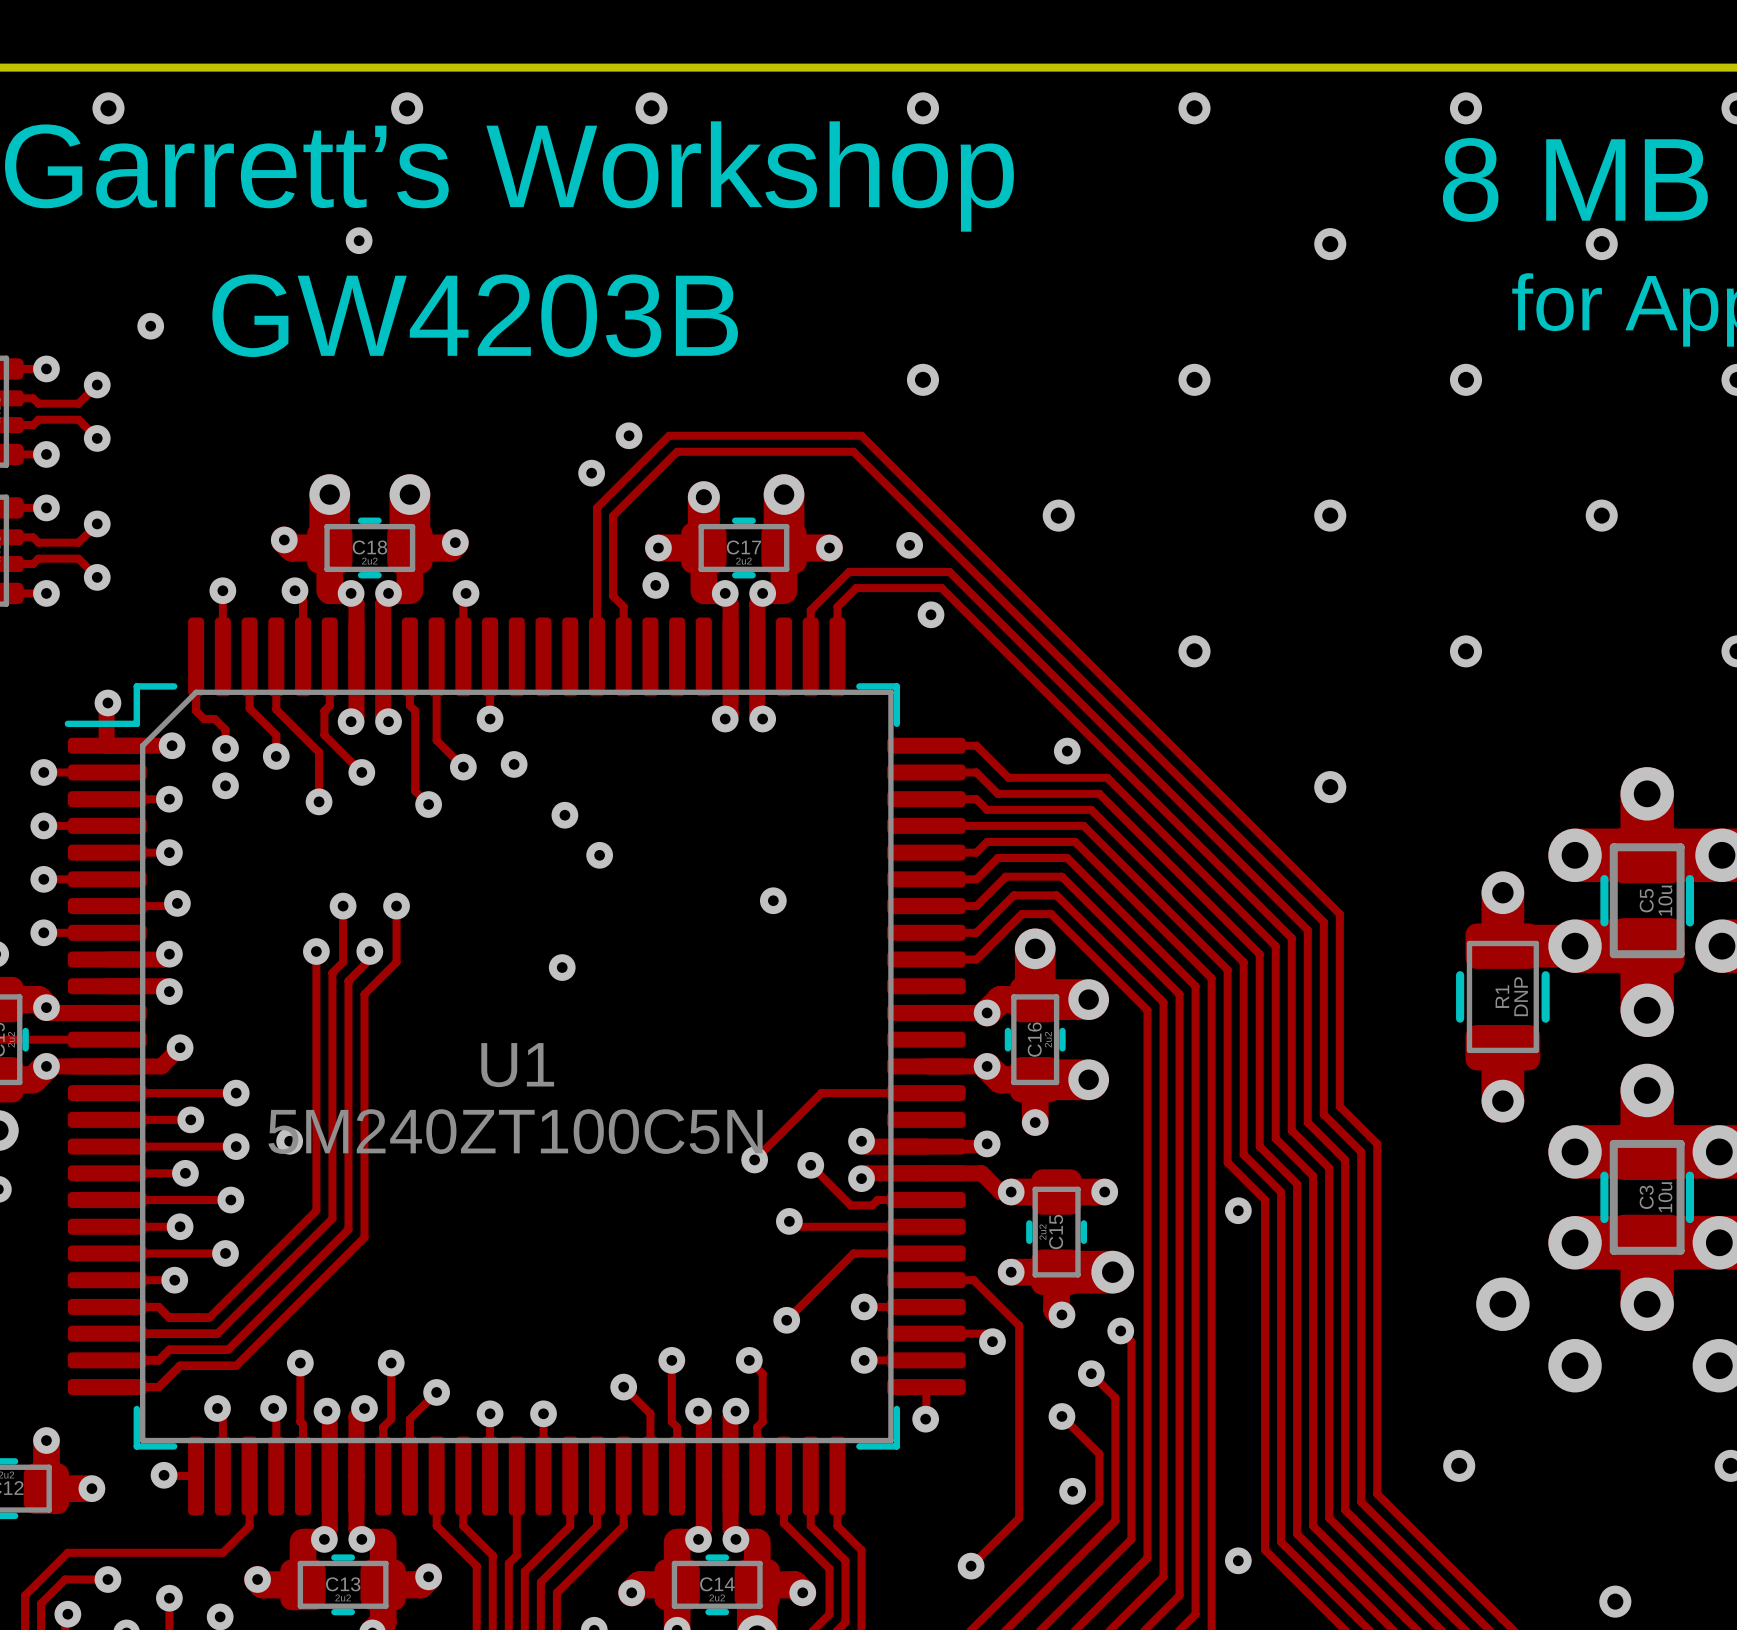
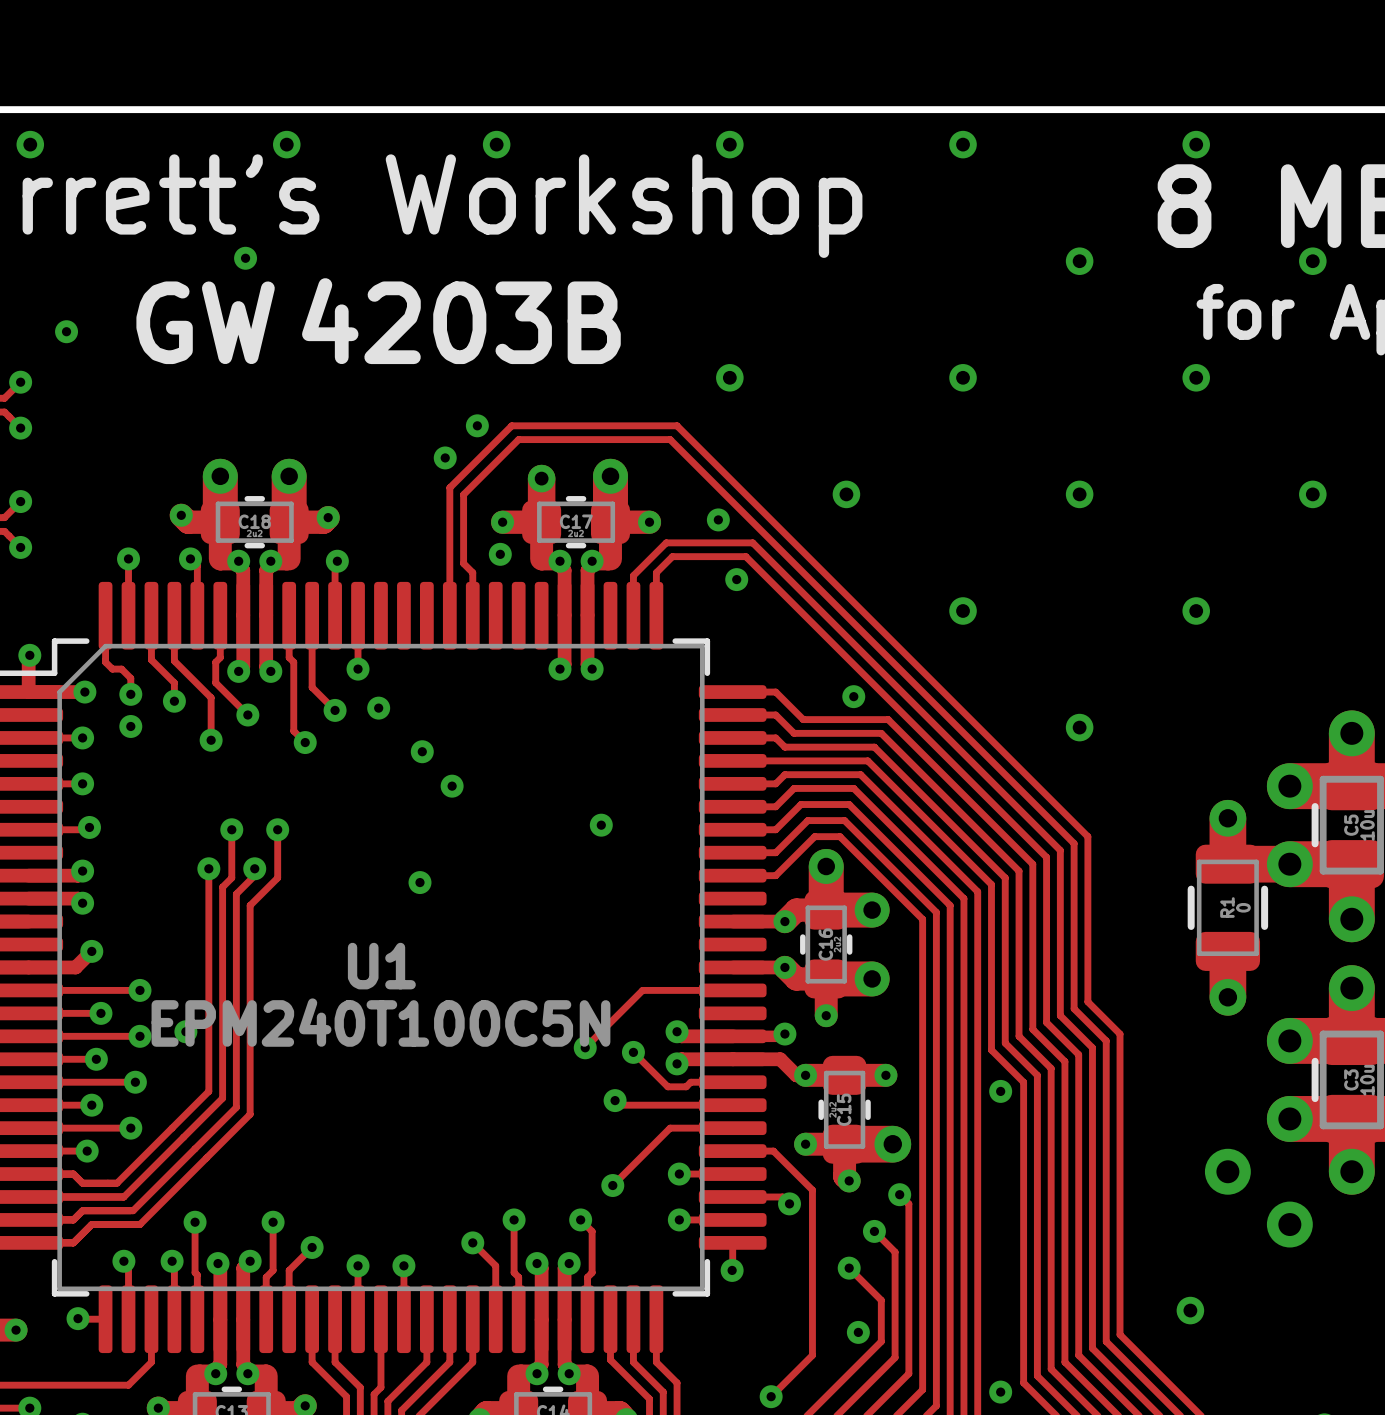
R1 value: DNP (1521, 996) -> 0 (1243, 907)
U1 value: 5M240ZT100C5N (515, 1131) -> EPM240T100C5N (380, 1022)

